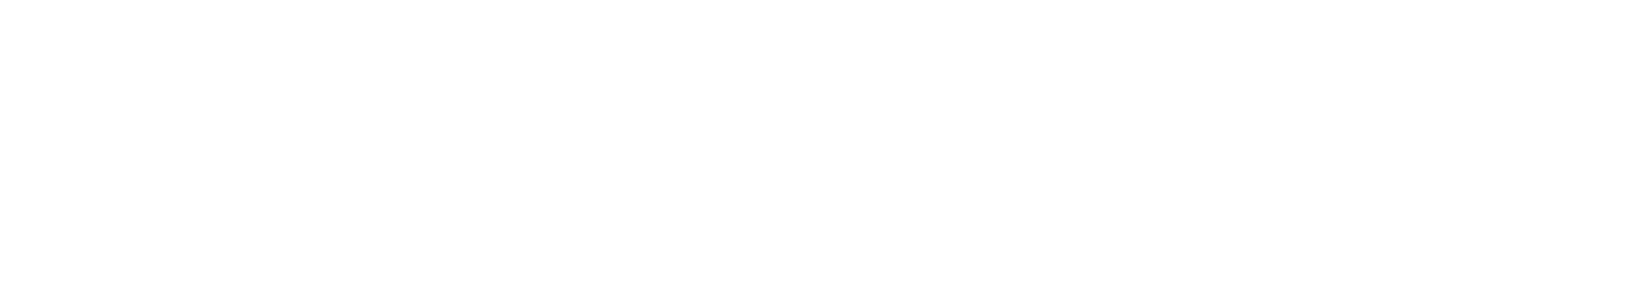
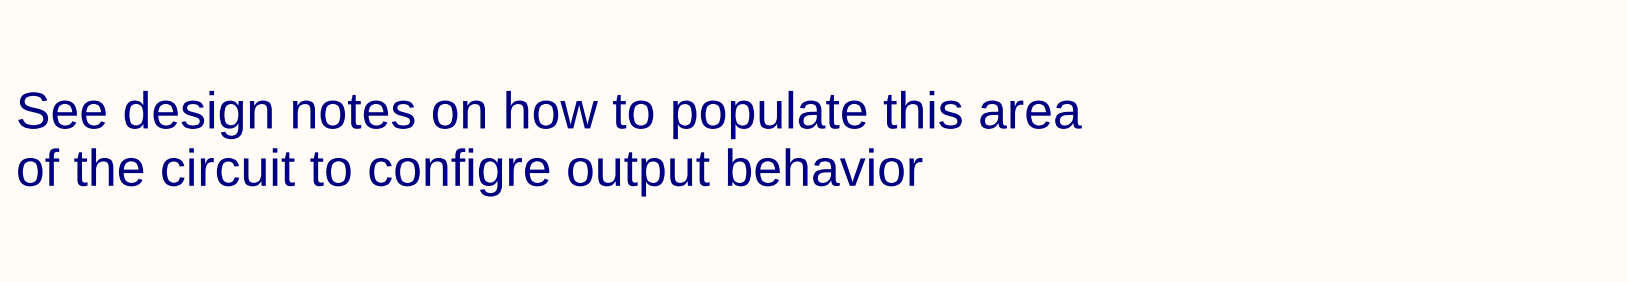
text: none -> See design notes on how to populate this area (550, 115)
text: none -> of the circuit to configre output behavior (470, 172)

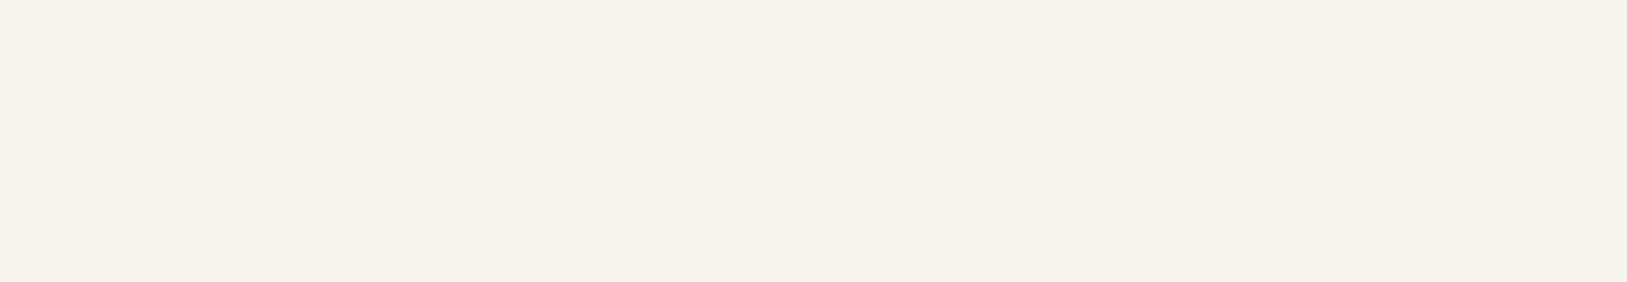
text: See design notes on how to populate this area (550, 115) -> none
text: of the circuit to configre output behavior (470, 172) -> none

